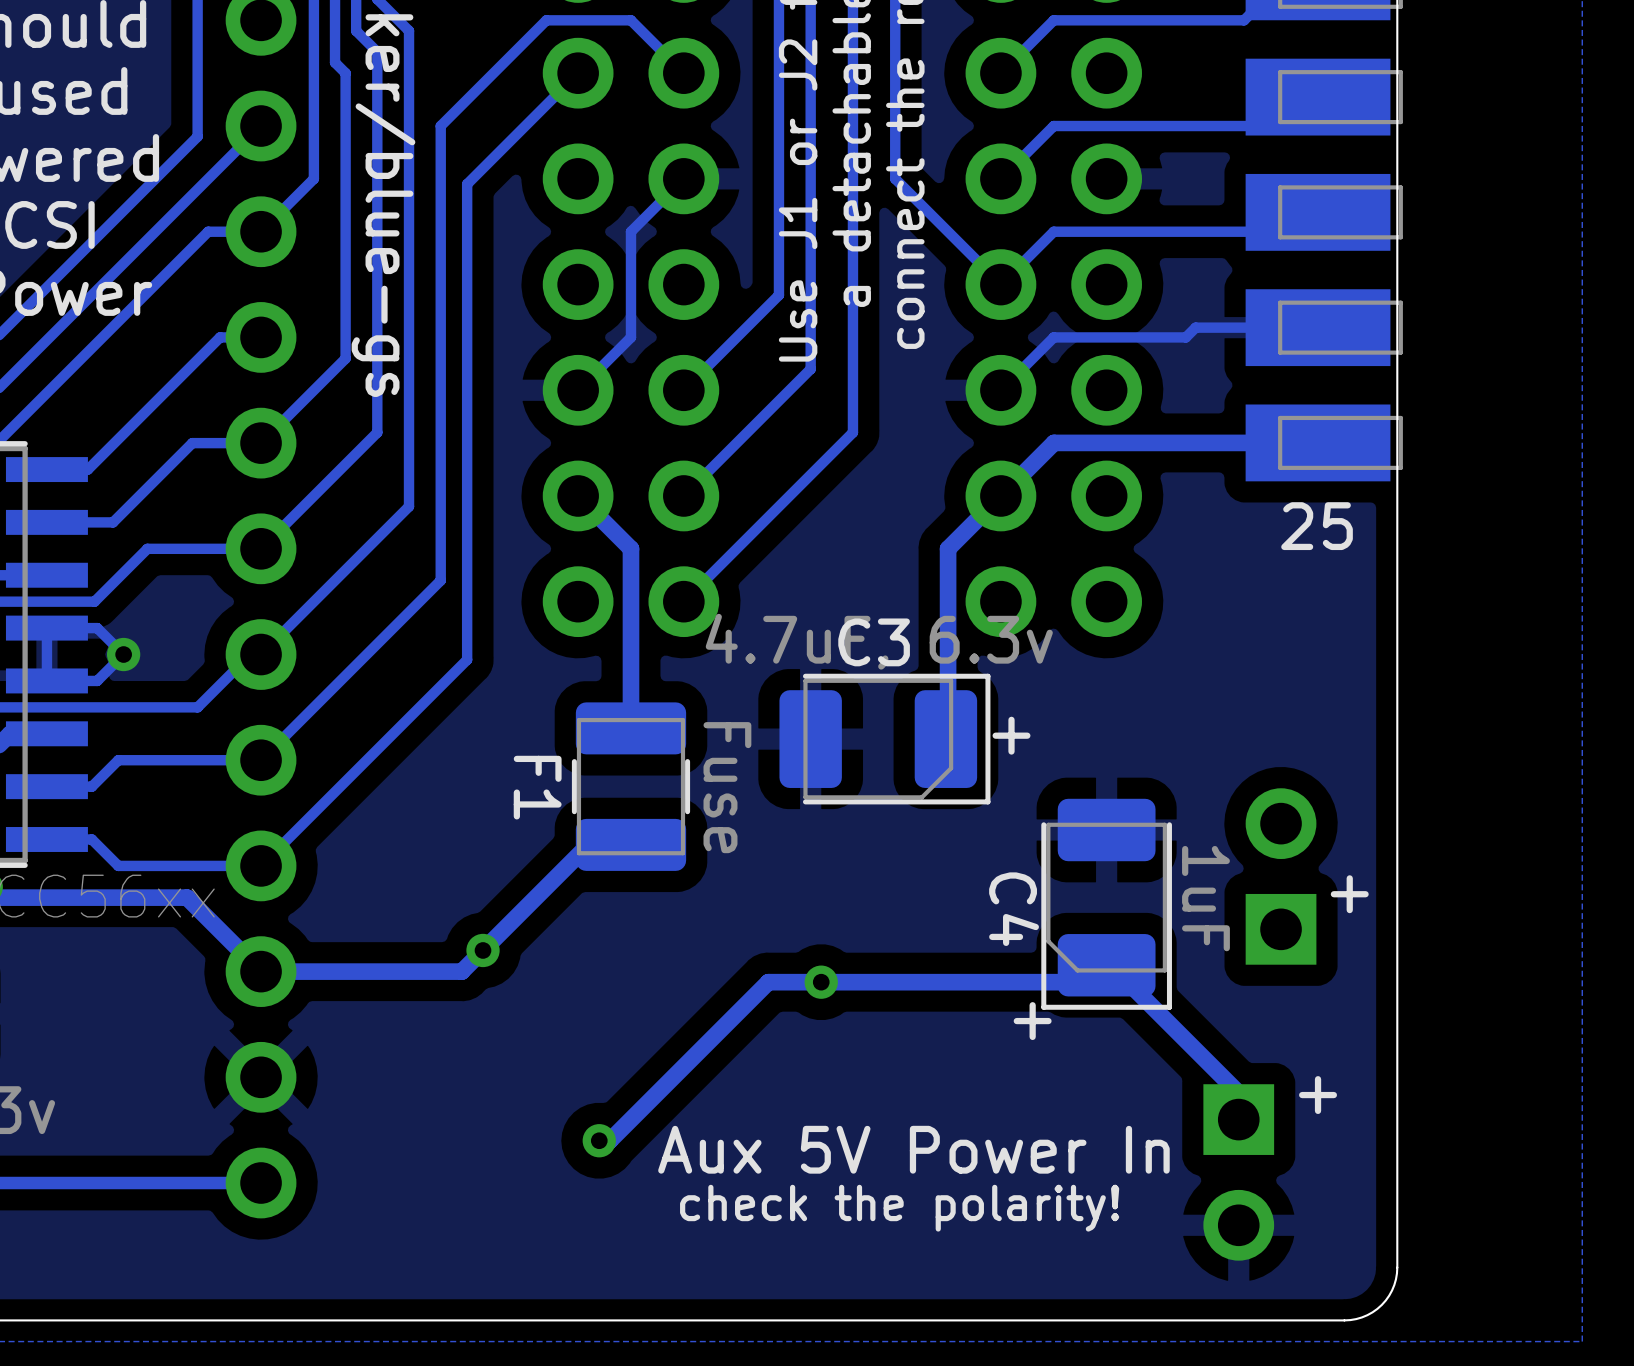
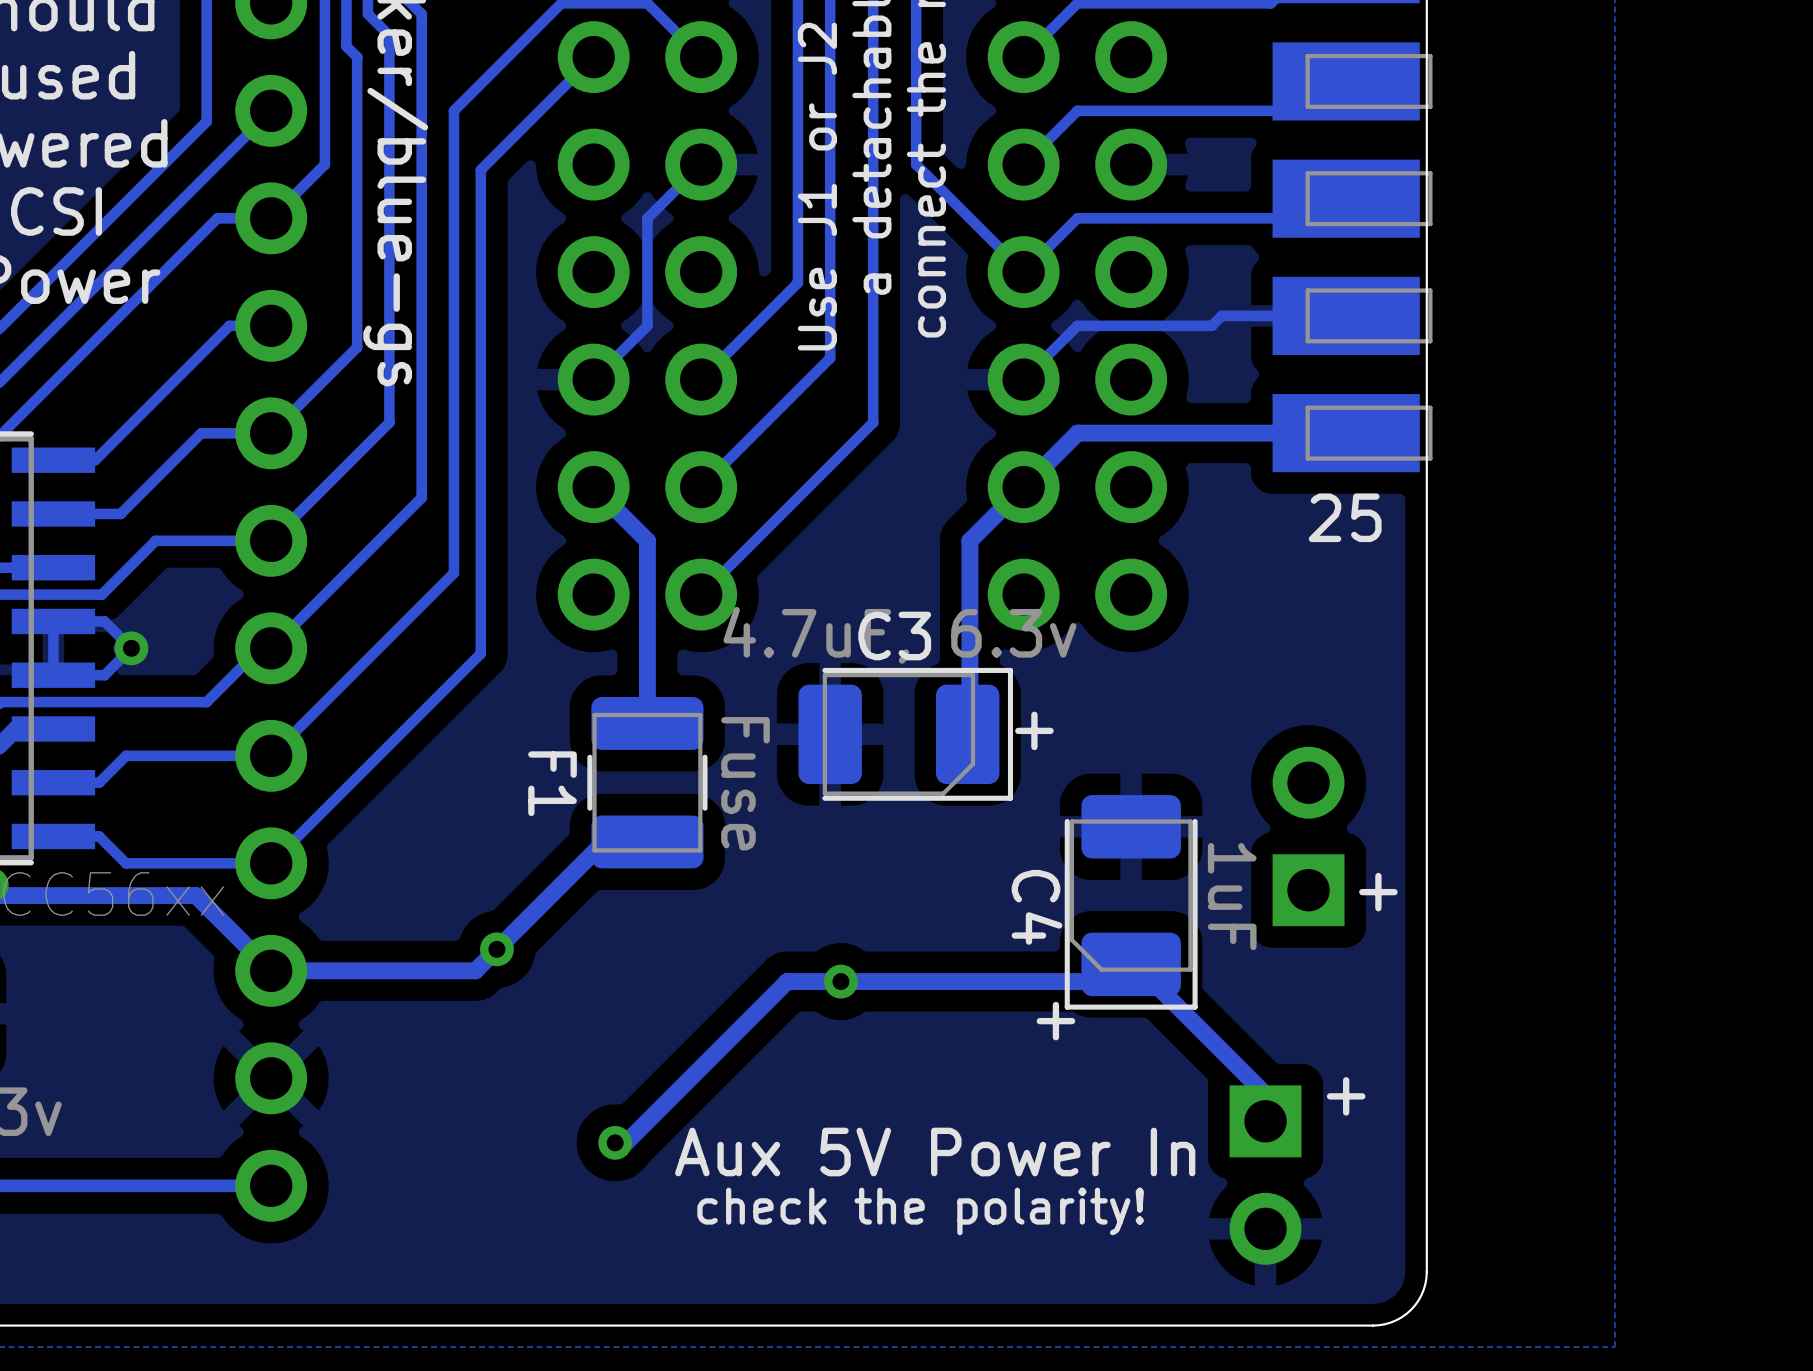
part position: (1281, 876) -> (1308, 836)

